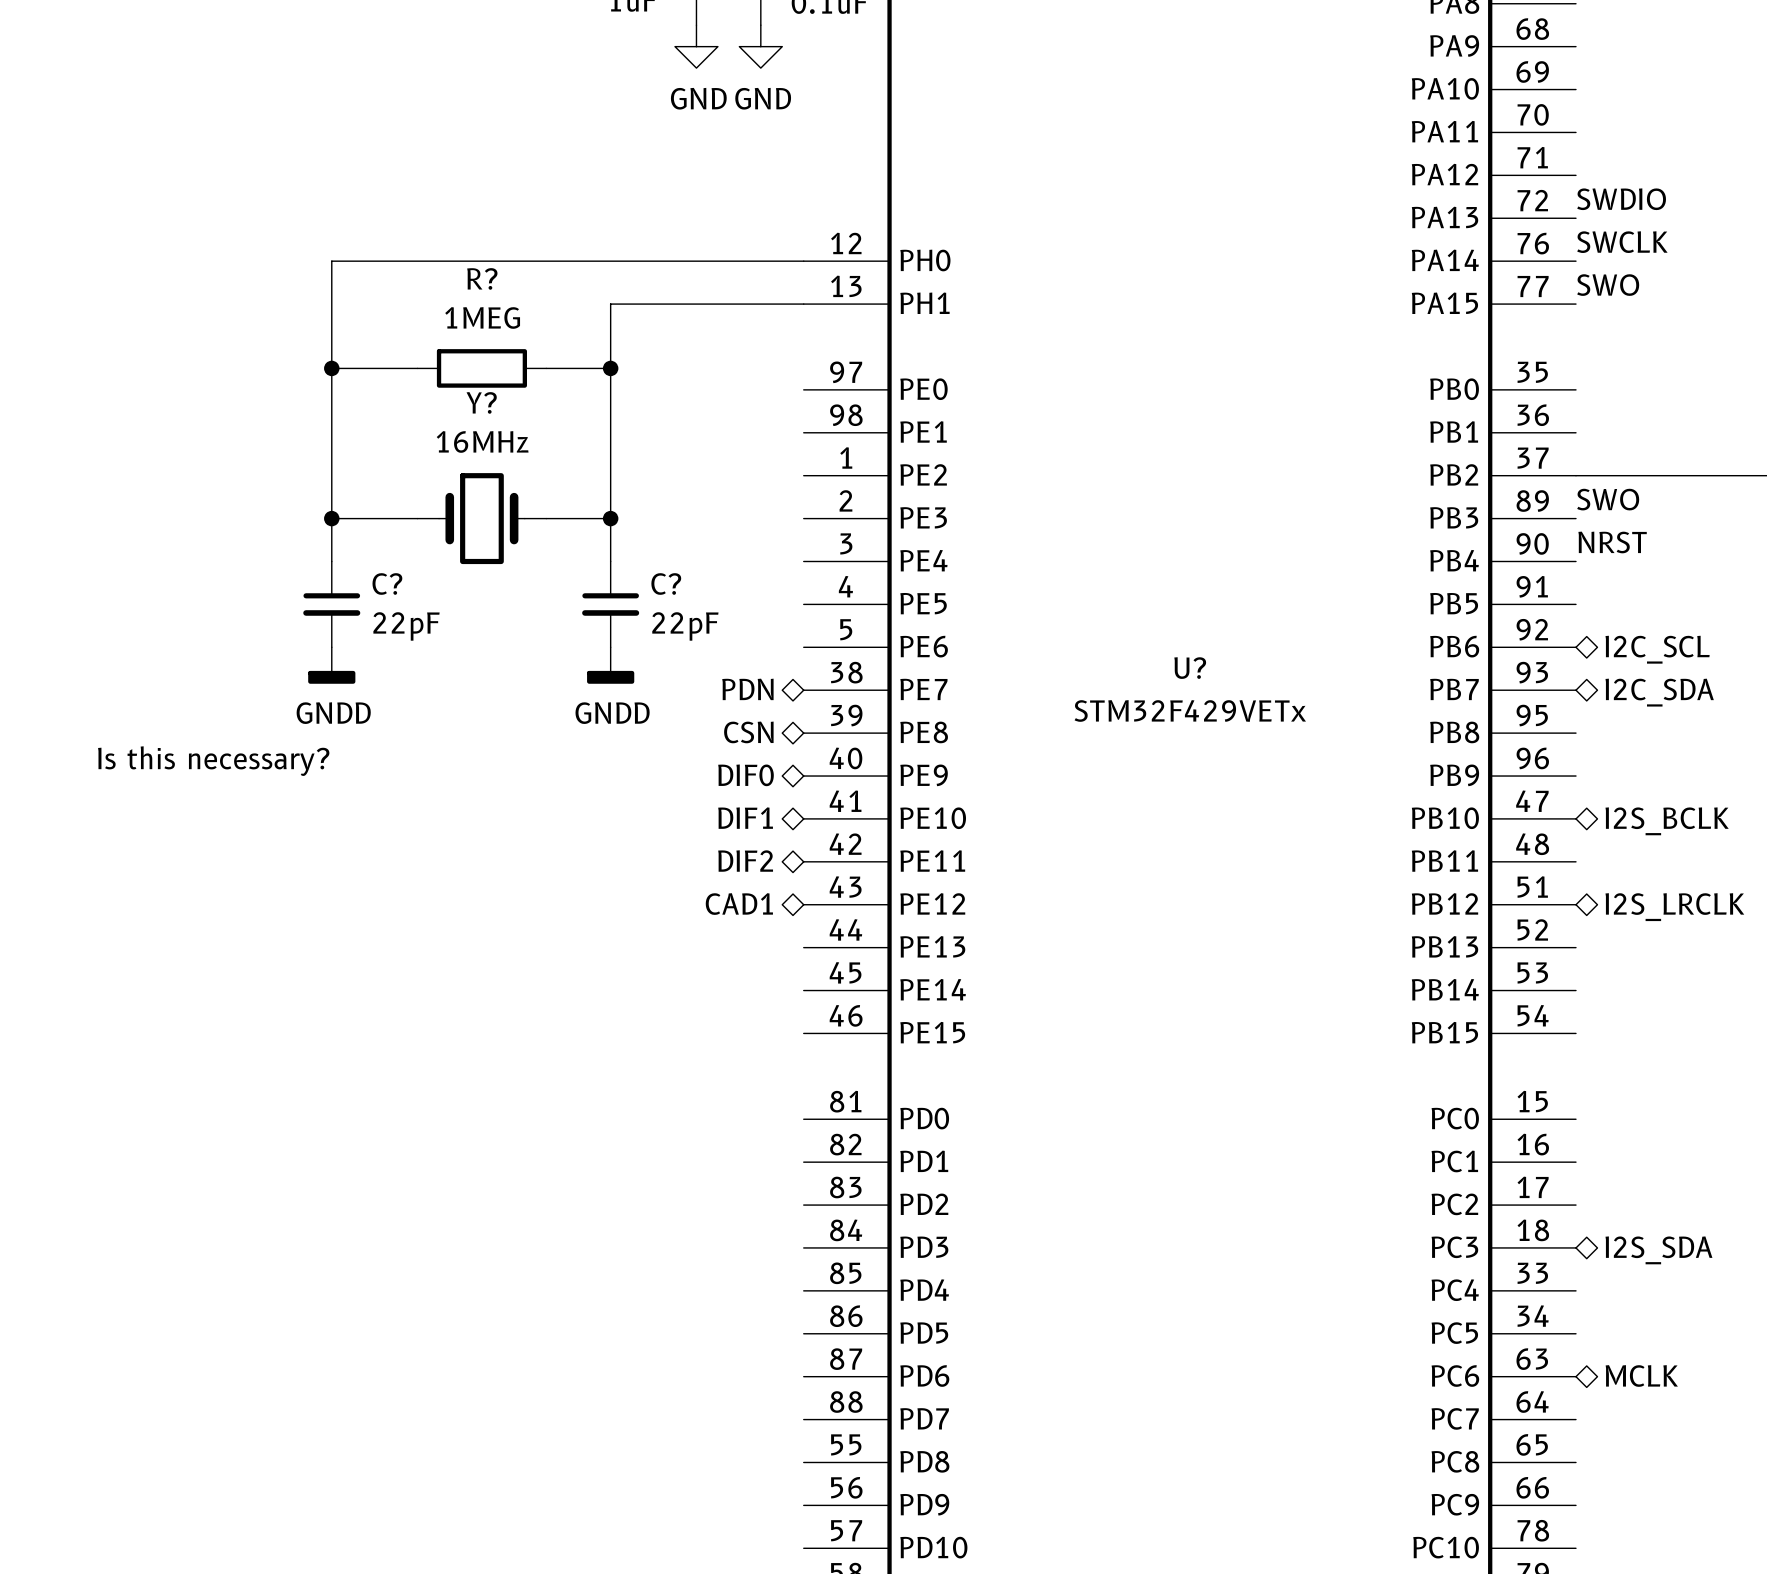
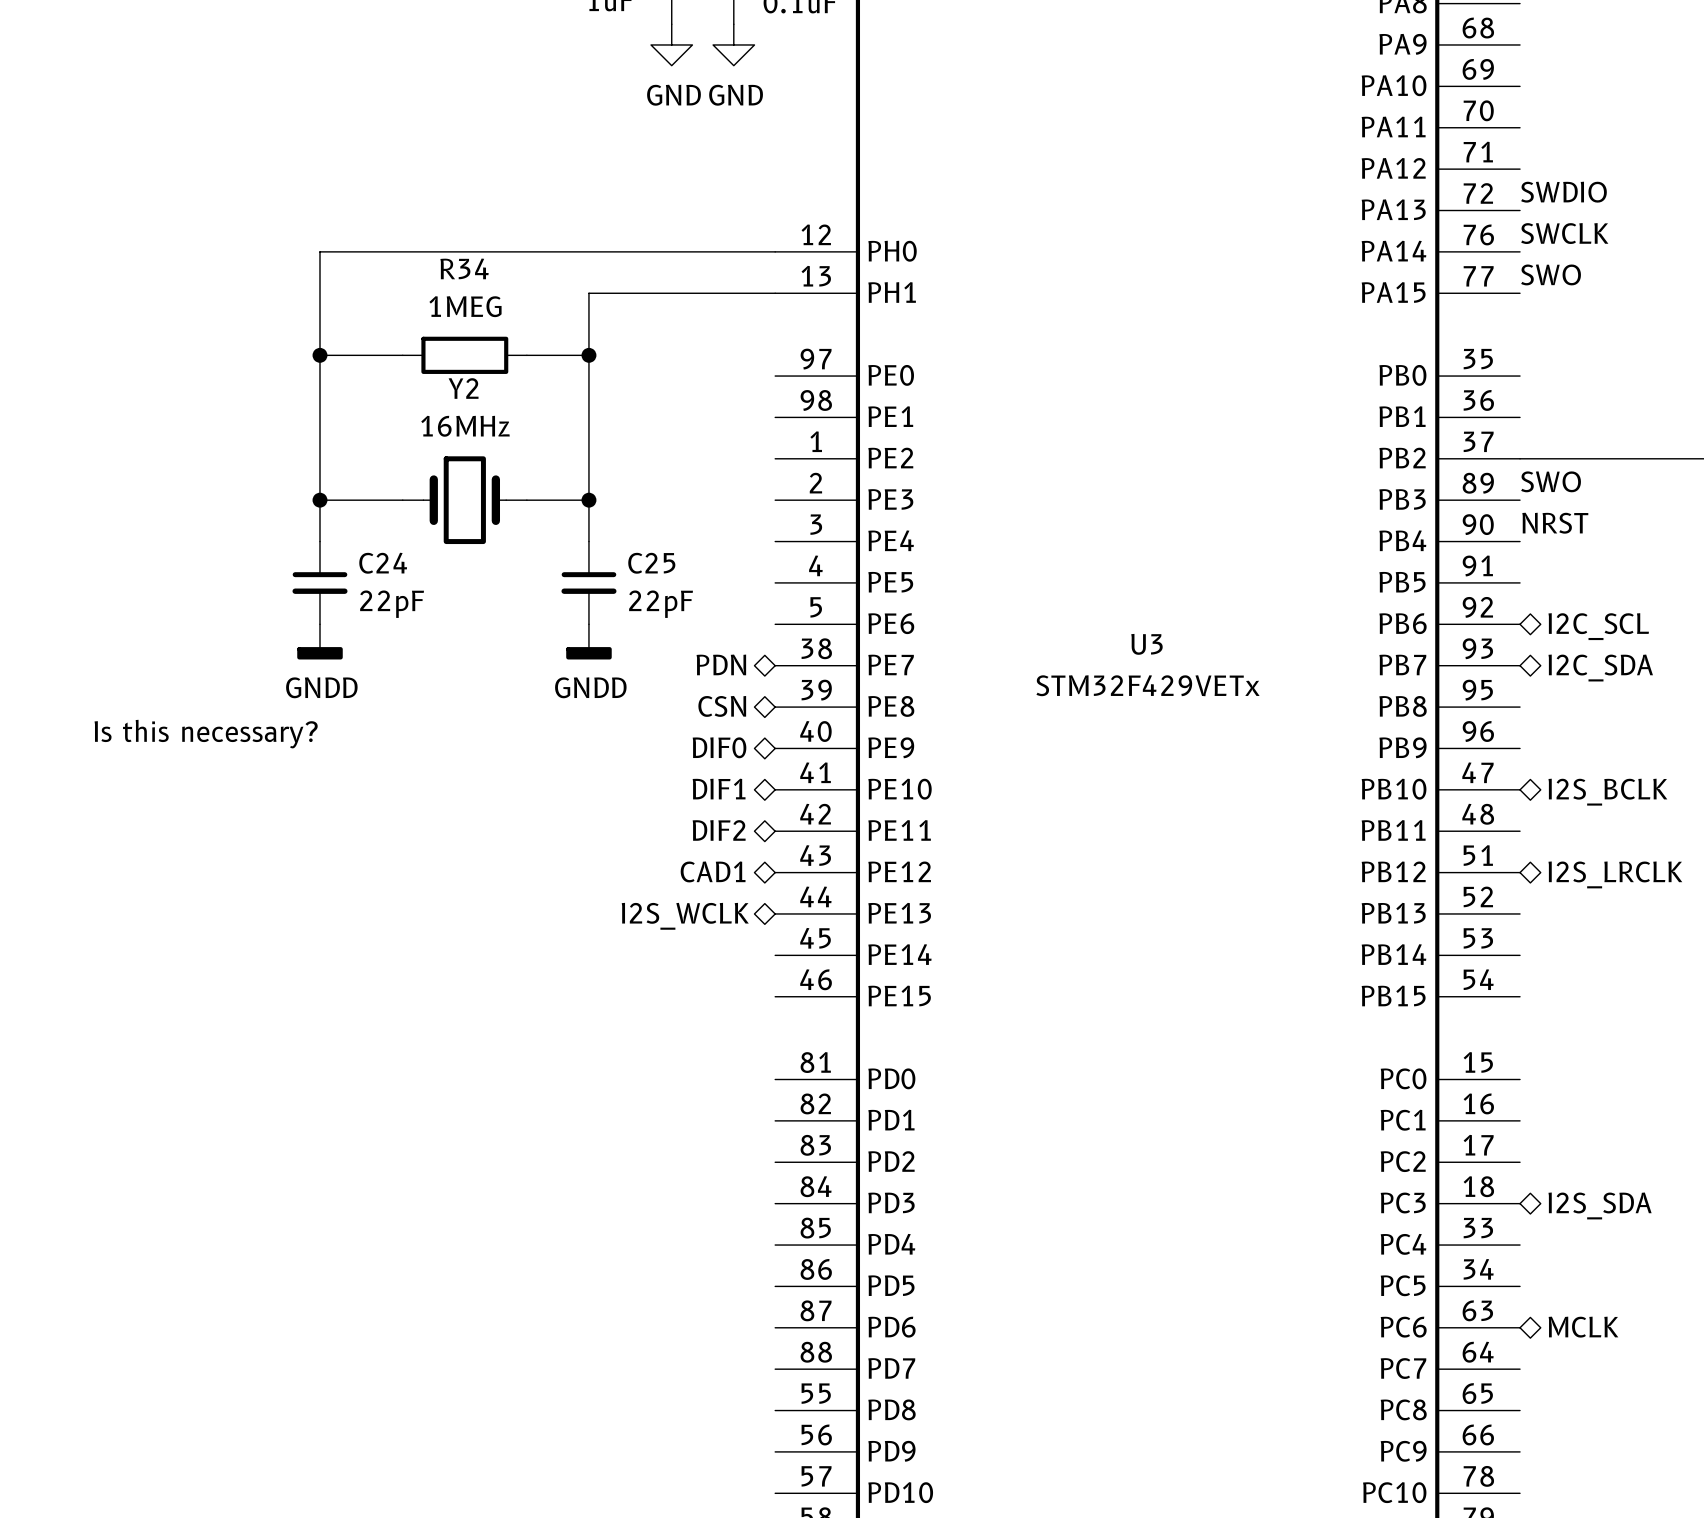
R? name: R? (482, 278) -> R34 (464, 268)
Y? name: Y? (481, 402) -> Y2 (463, 388)
C? name: C? (387, 584) -> C24 (383, 563)
C? name: C? (666, 584) -> C25 (651, 563)
U? name: U? (1190, 668) -> U3 (1146, 644)
hierarchical label: none -> I2S_WCLK (685, 916)

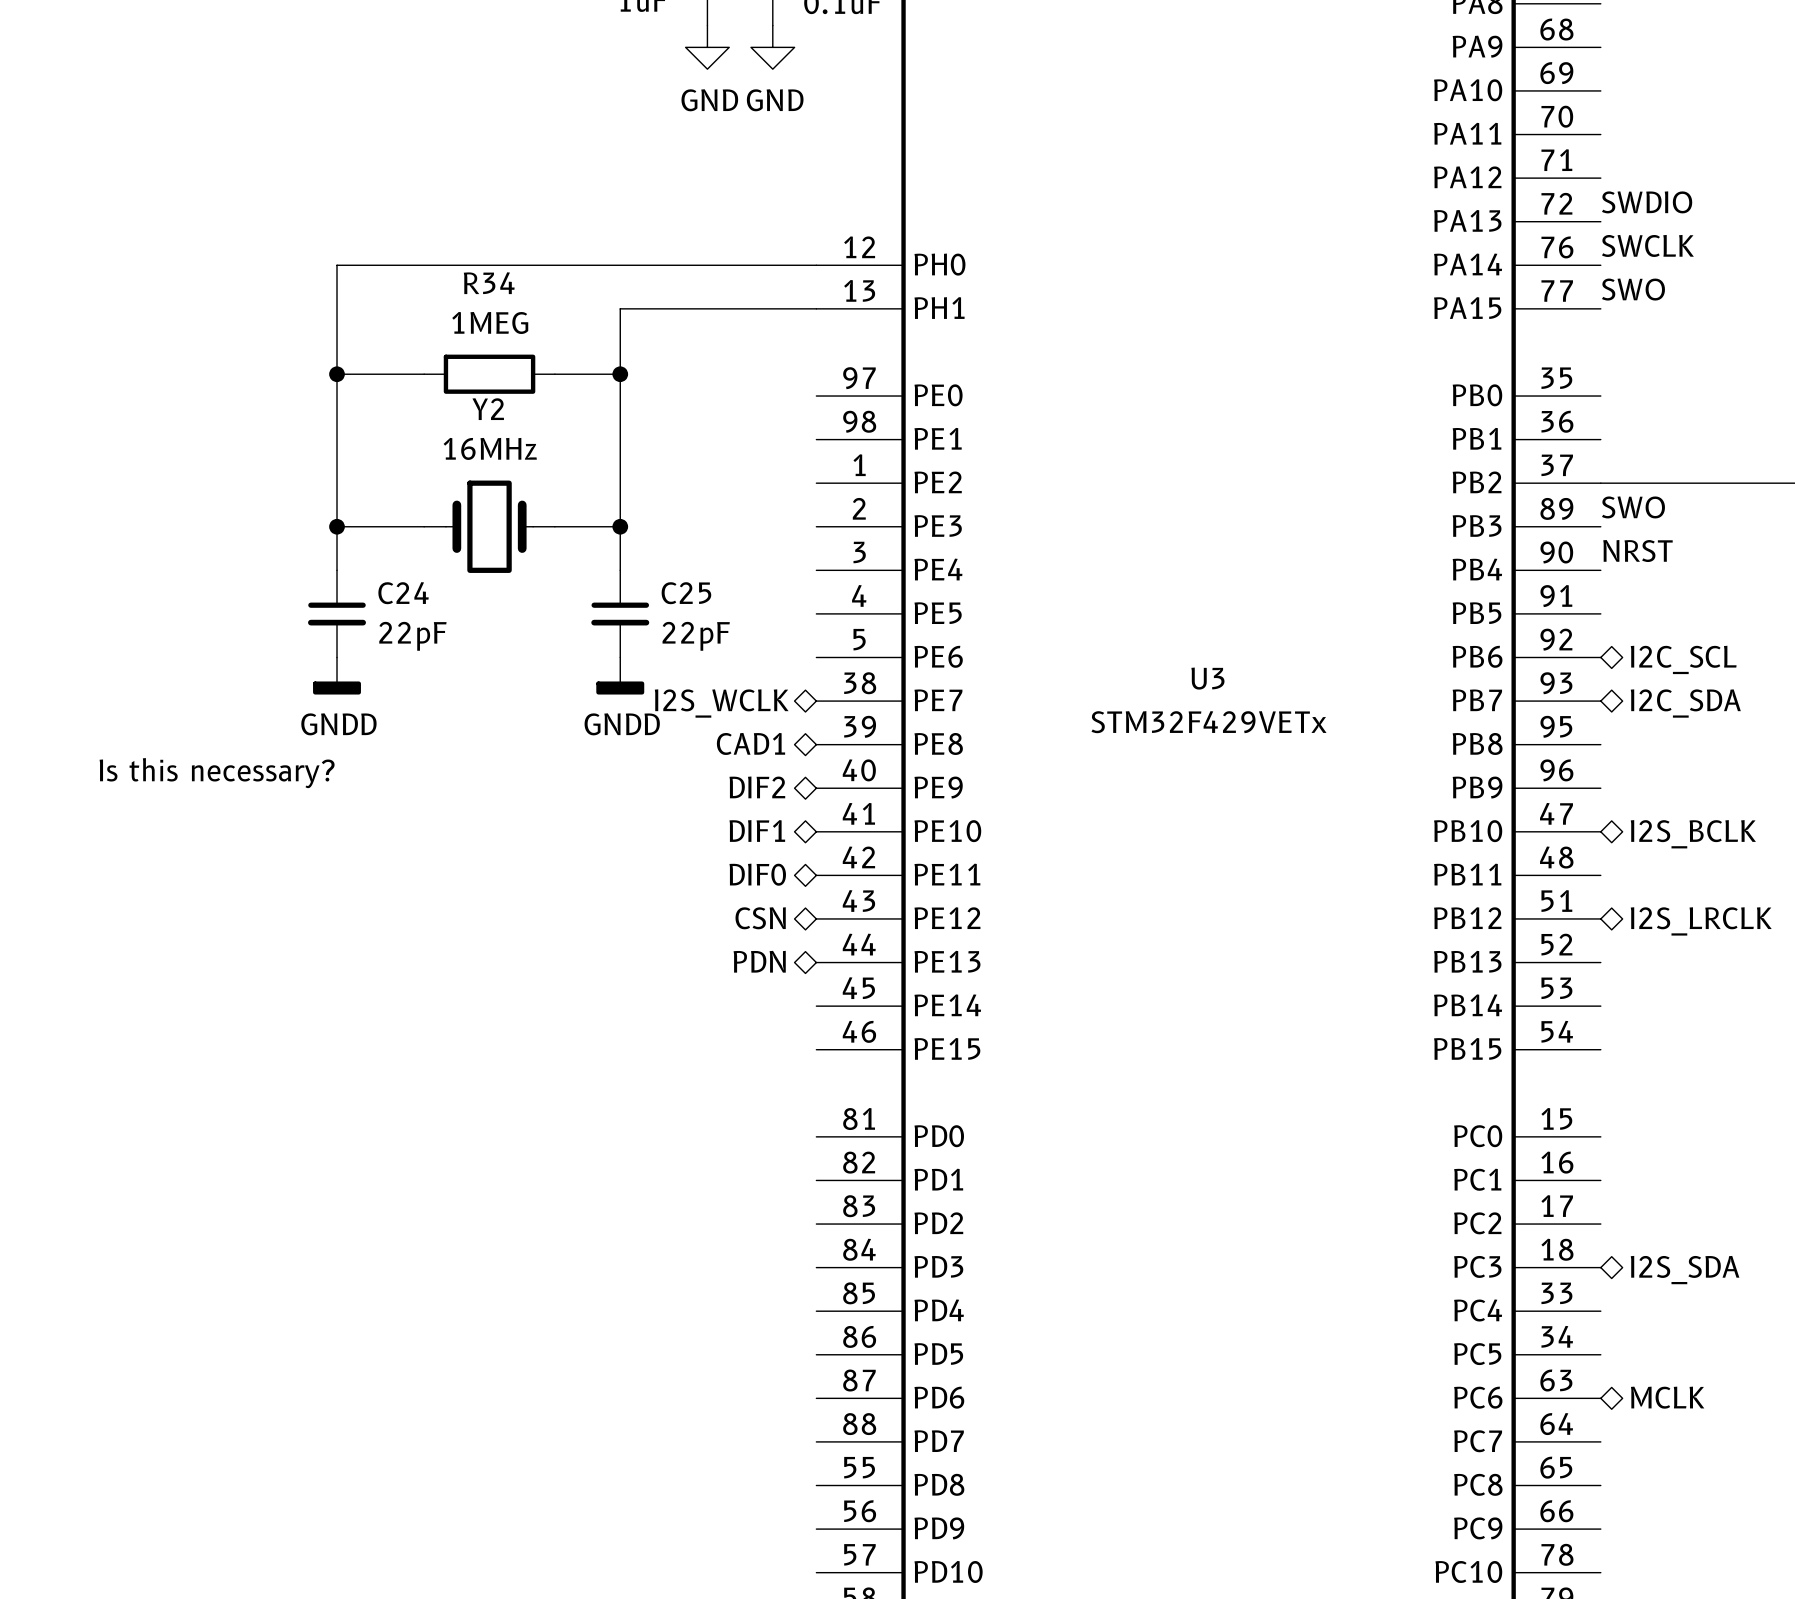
hierarchical label: PDN (721, 664) -> I2S_WCLK (721, 703)
hierarchical label: CSN (722, 706) -> CAD1 (750, 743)
hierarchical label: DIF0 (719, 747) -> DIF2 (757, 787)
hierarchical label: DIF2 (719, 830) -> DIF0 (757, 874)
hierarchical label: CAD1 (713, 871) -> CSN (760, 918)
hierarchical label: I2S_WCLK (685, 916) -> PDN (759, 961)

